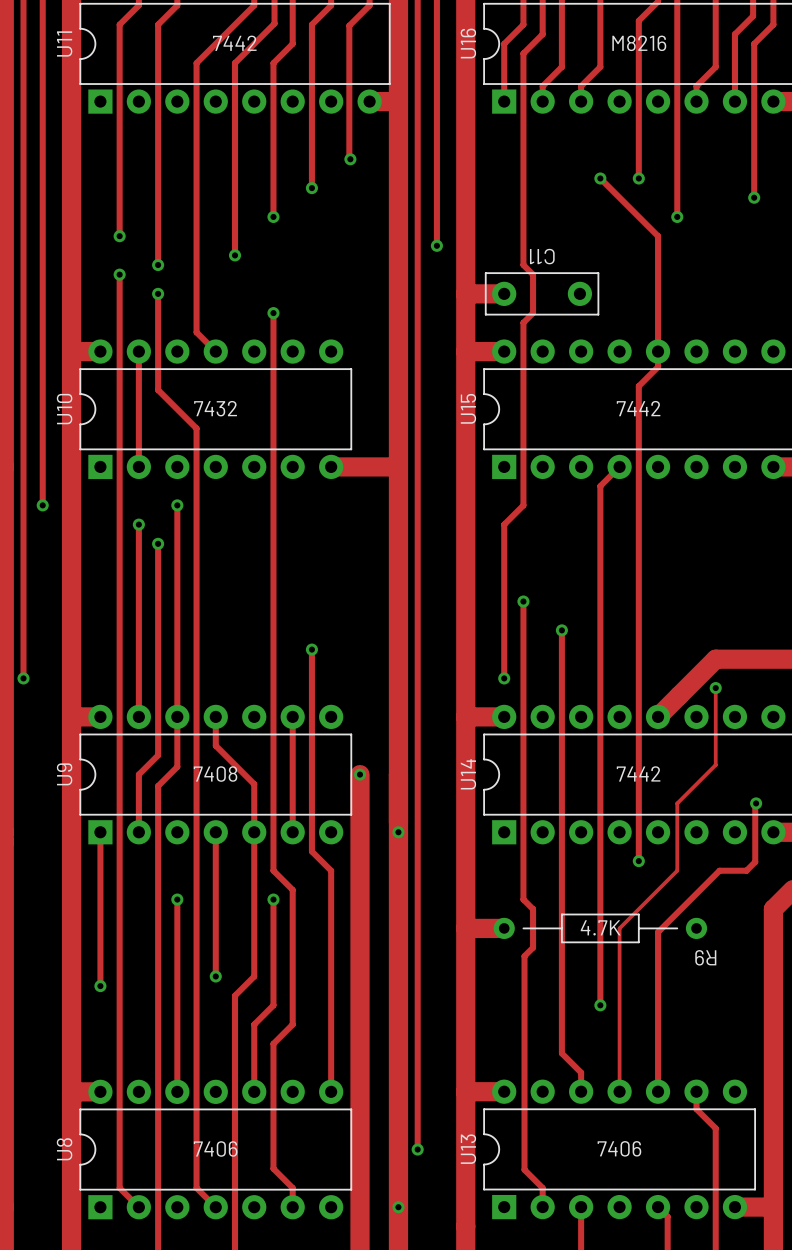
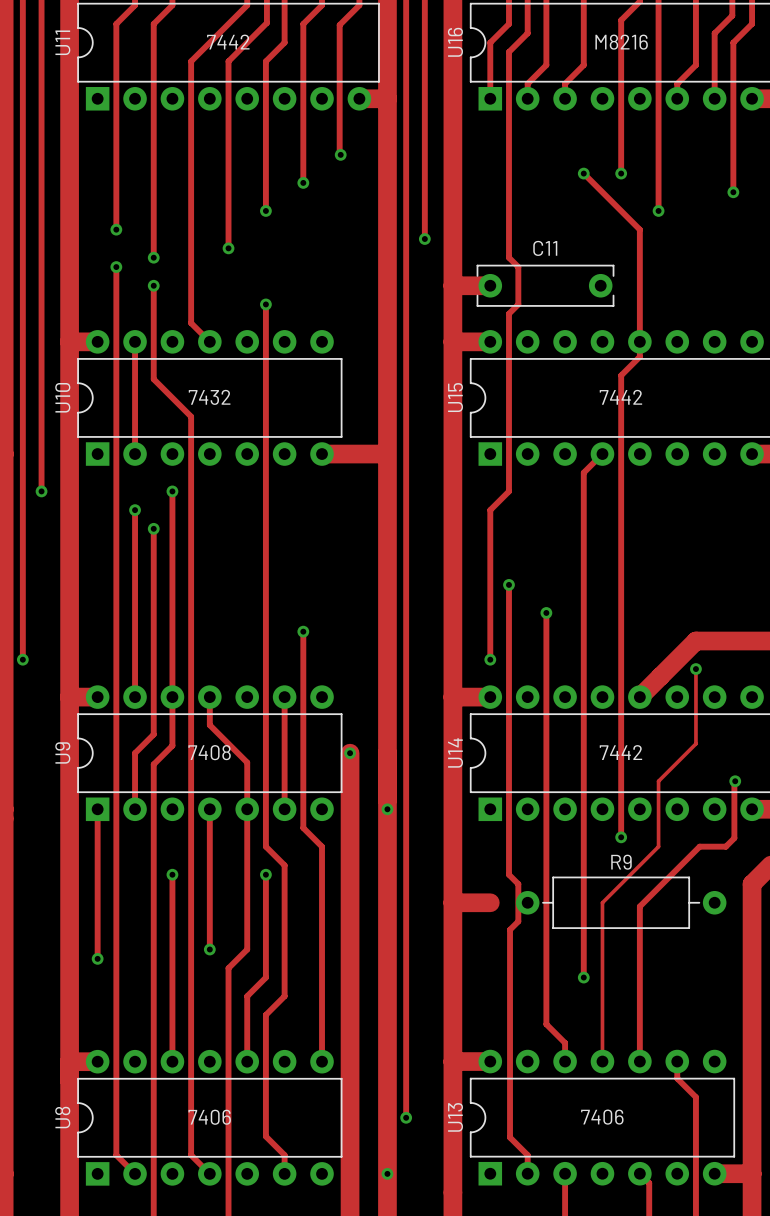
C11 footprint: [484, 272, 600, 316] -> [476, 264, 615, 307]
R9 footprint: [493, 913, 708, 944] -> [515, 876, 727, 929]
R9 value: 4.7K (600, 927) -> none
R9 name position: R9 (705, 957) -> R9 (621, 862)

